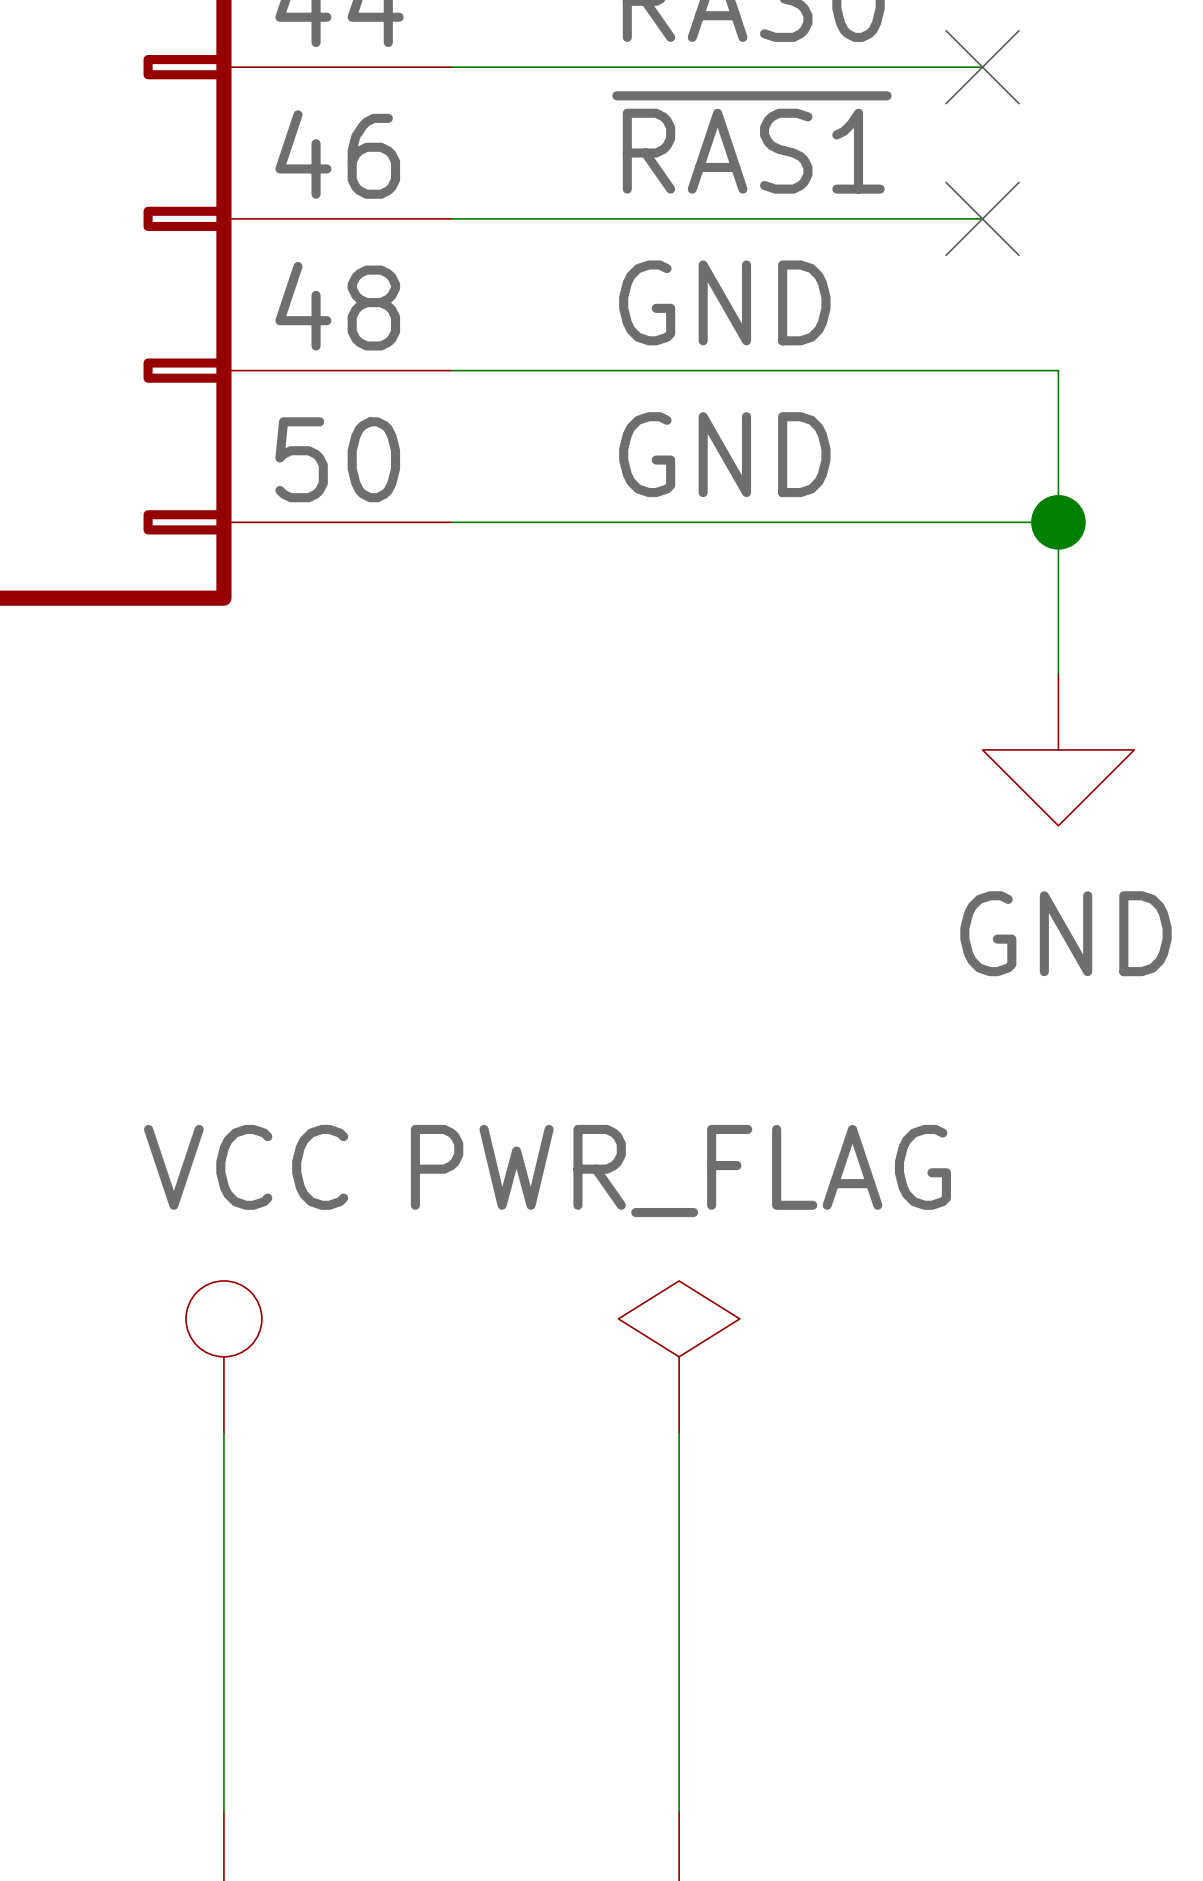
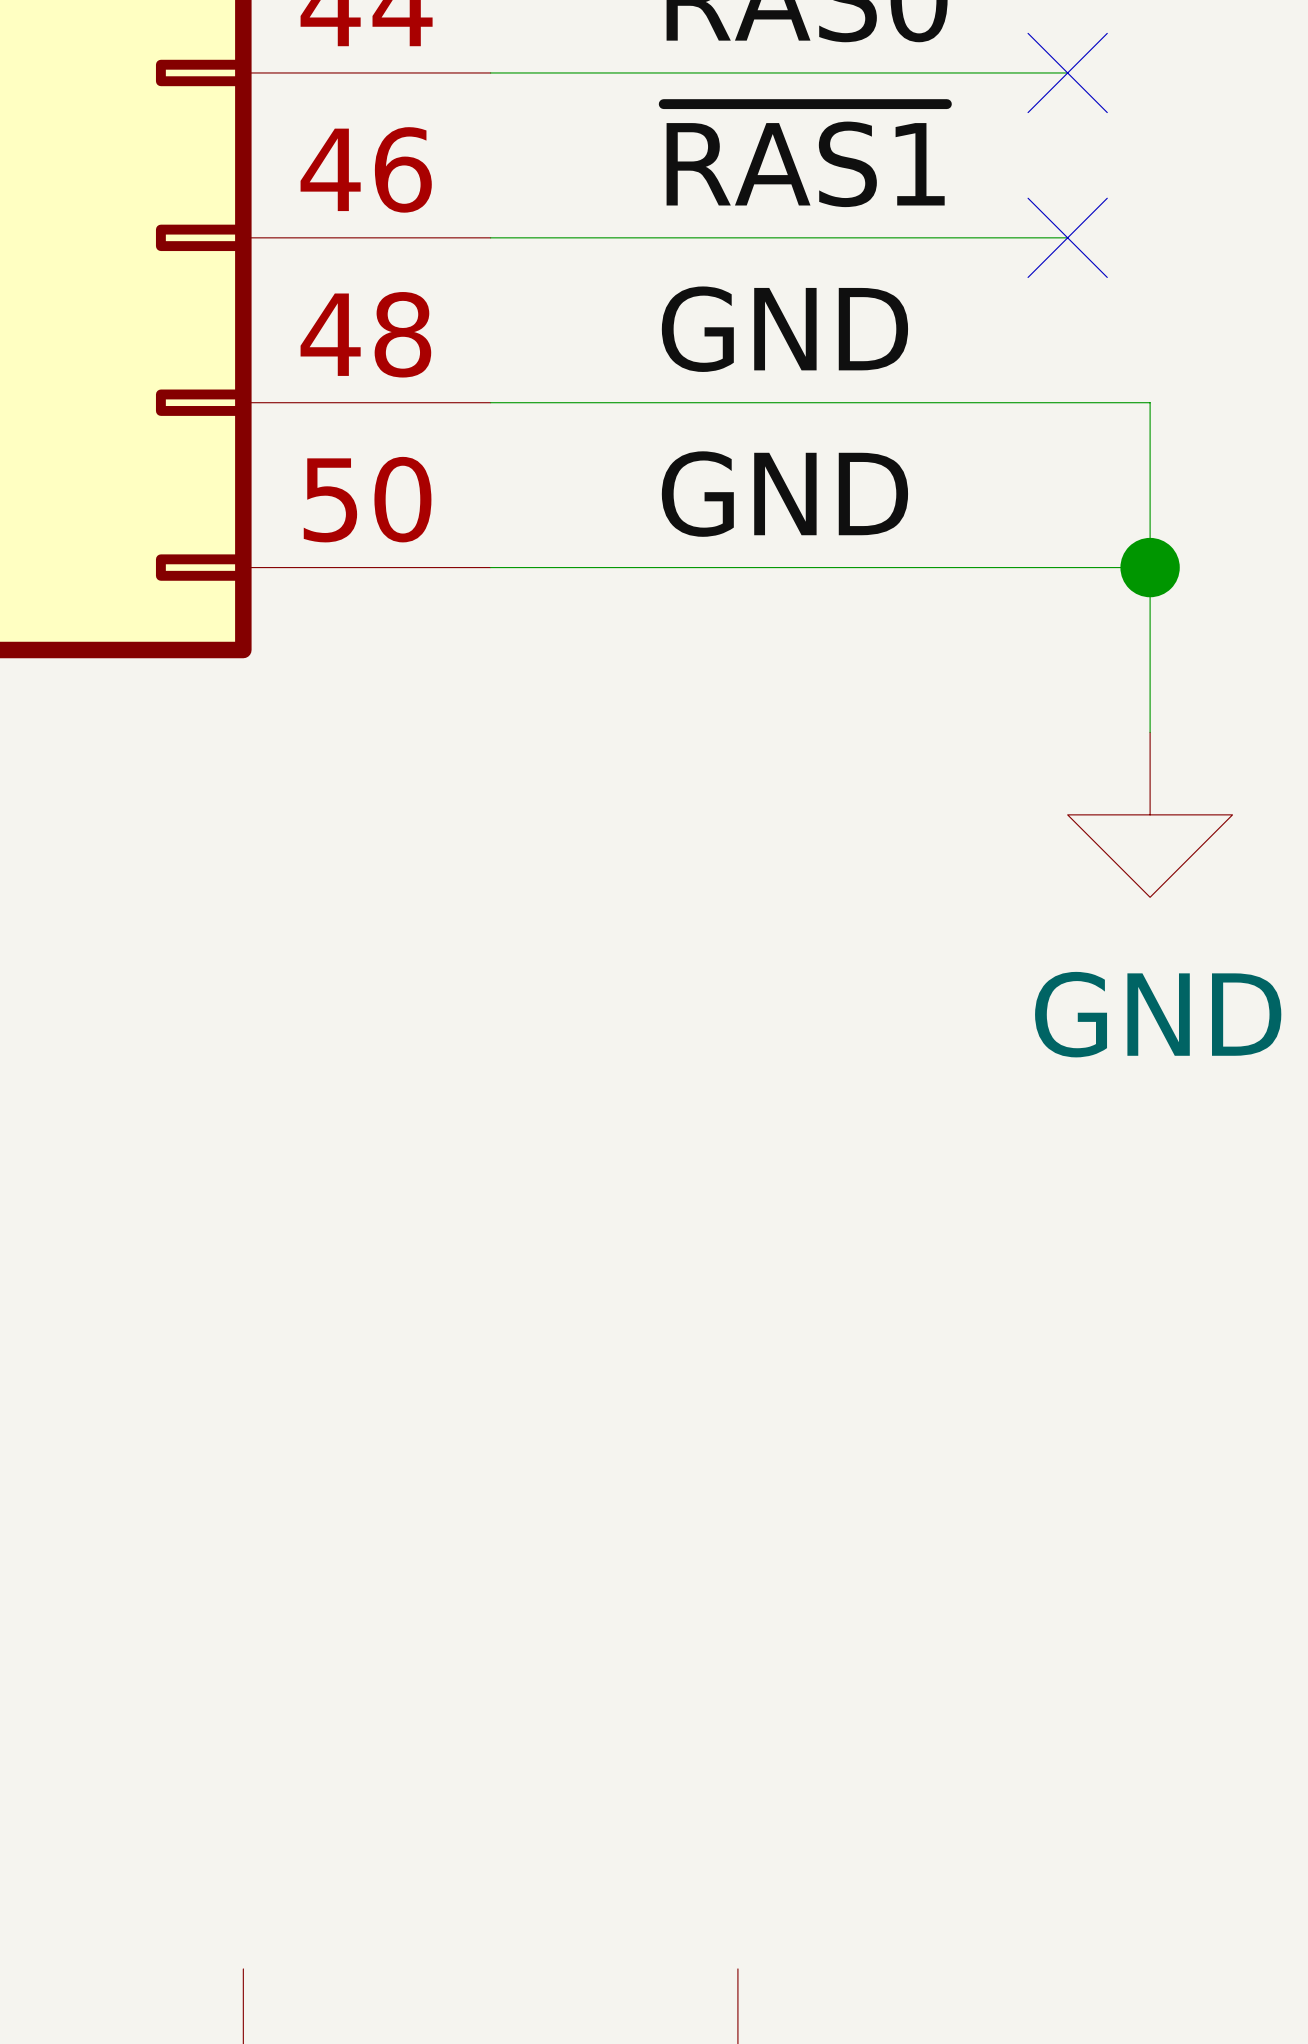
power symbol: VCC (223, 1356) -> none
power symbol: PWR_FLAG (679, 1356) -> none
wire: (223, 1432) (223, 1811) -> none
wire: (679, 1432) (679, 1811) -> none

